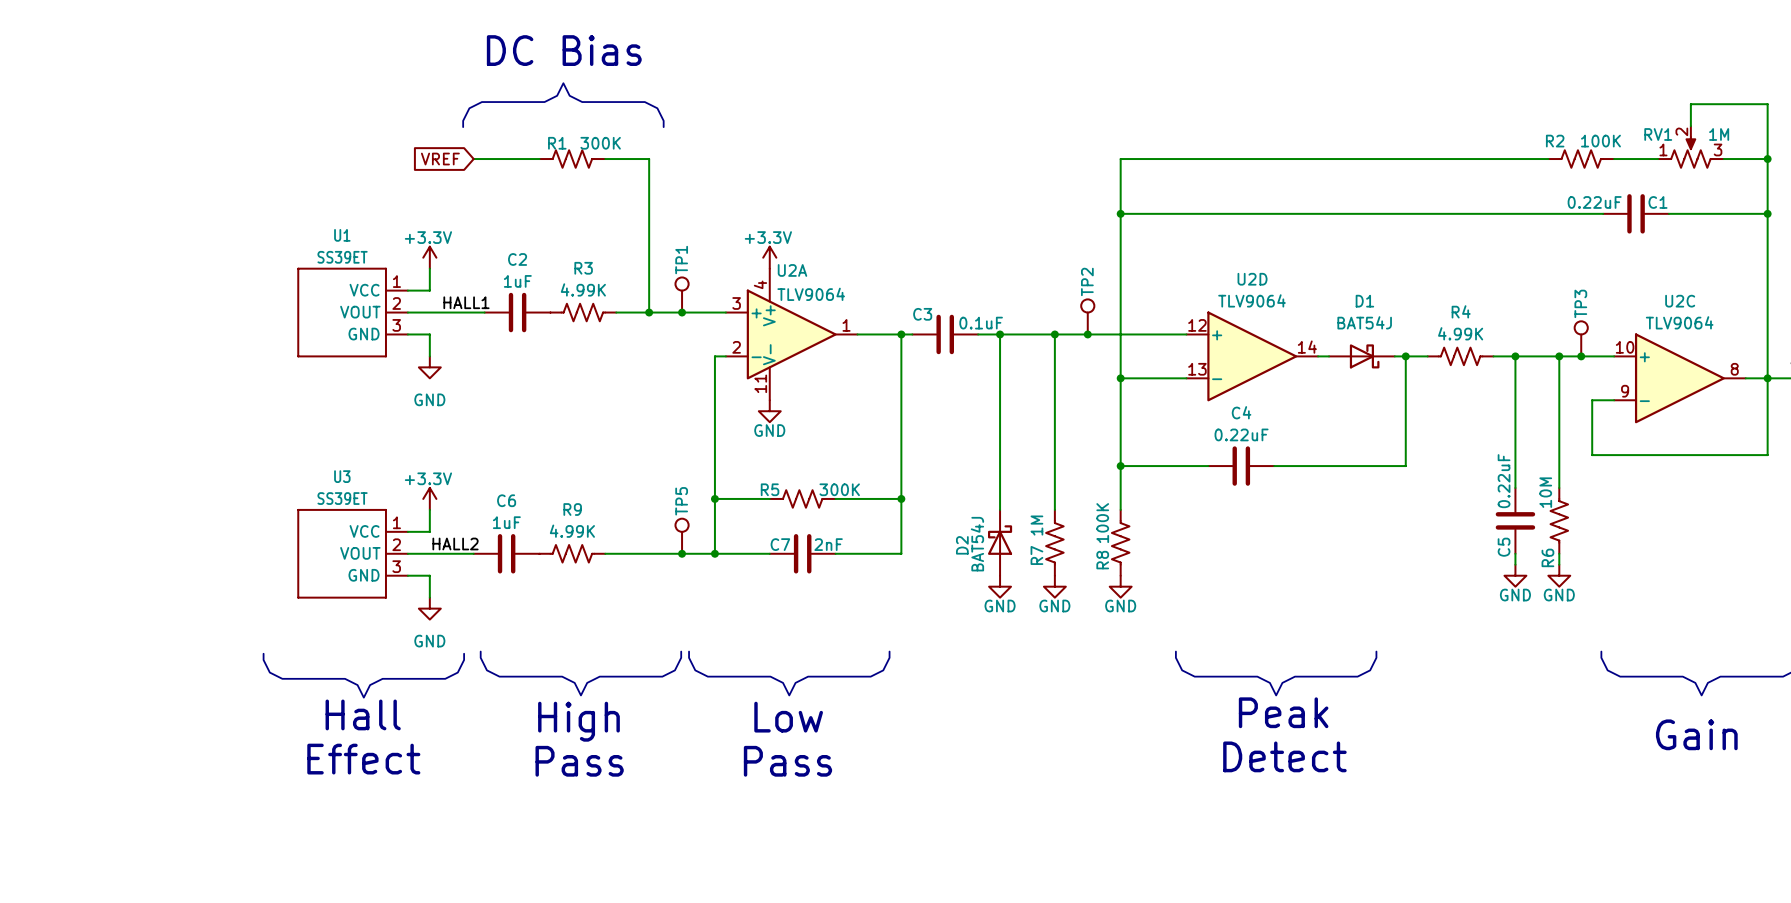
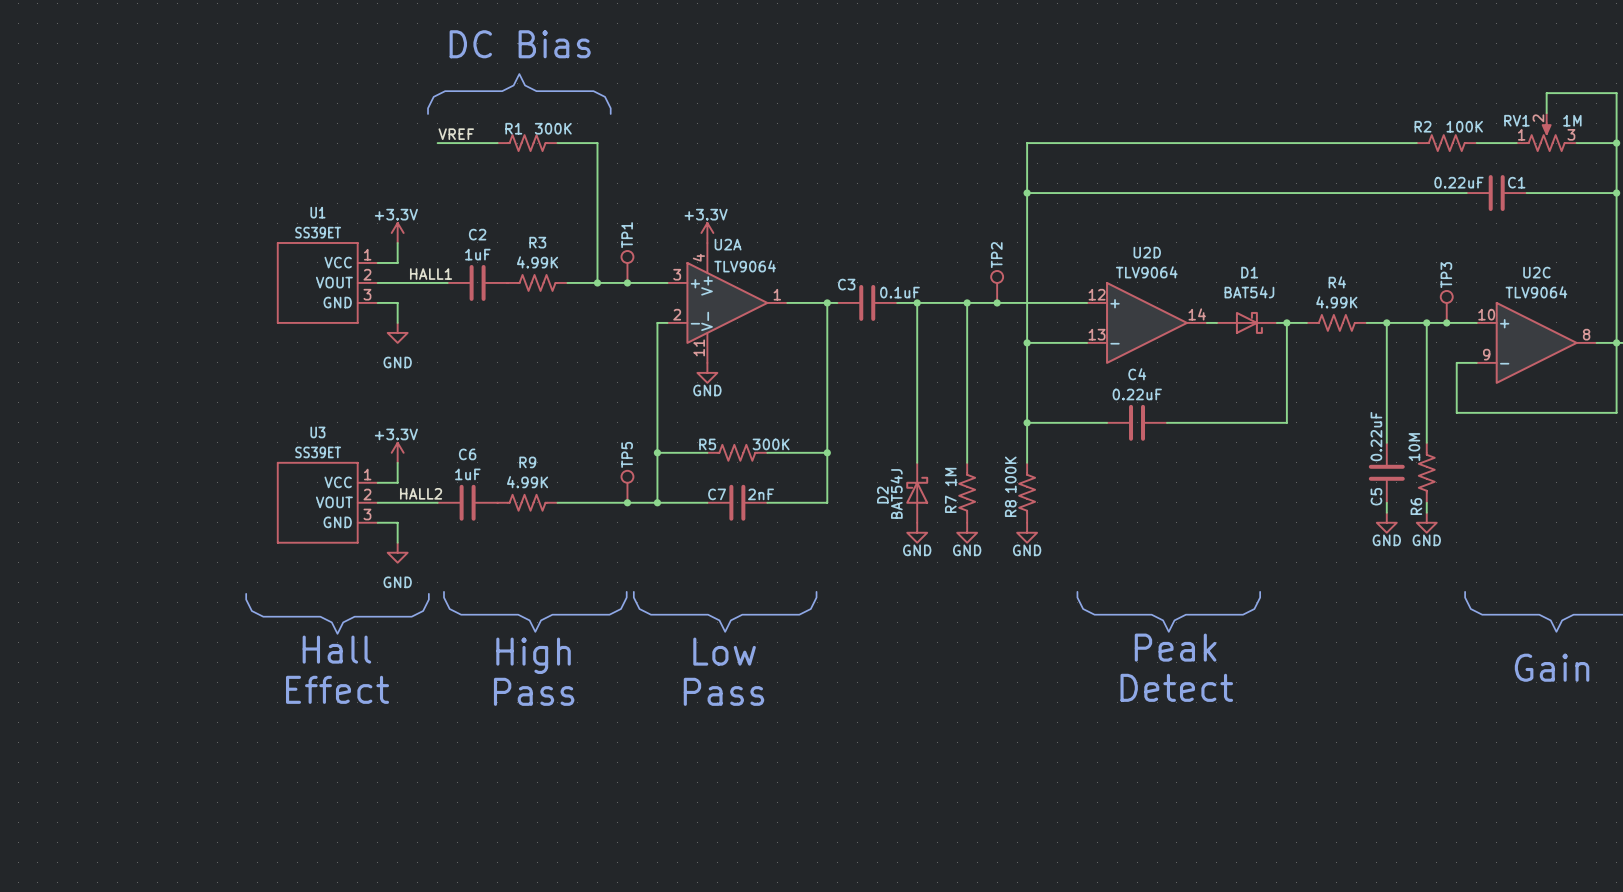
label: none -> VREF (456, 134)
global label: VREF (440, 159) -> none

